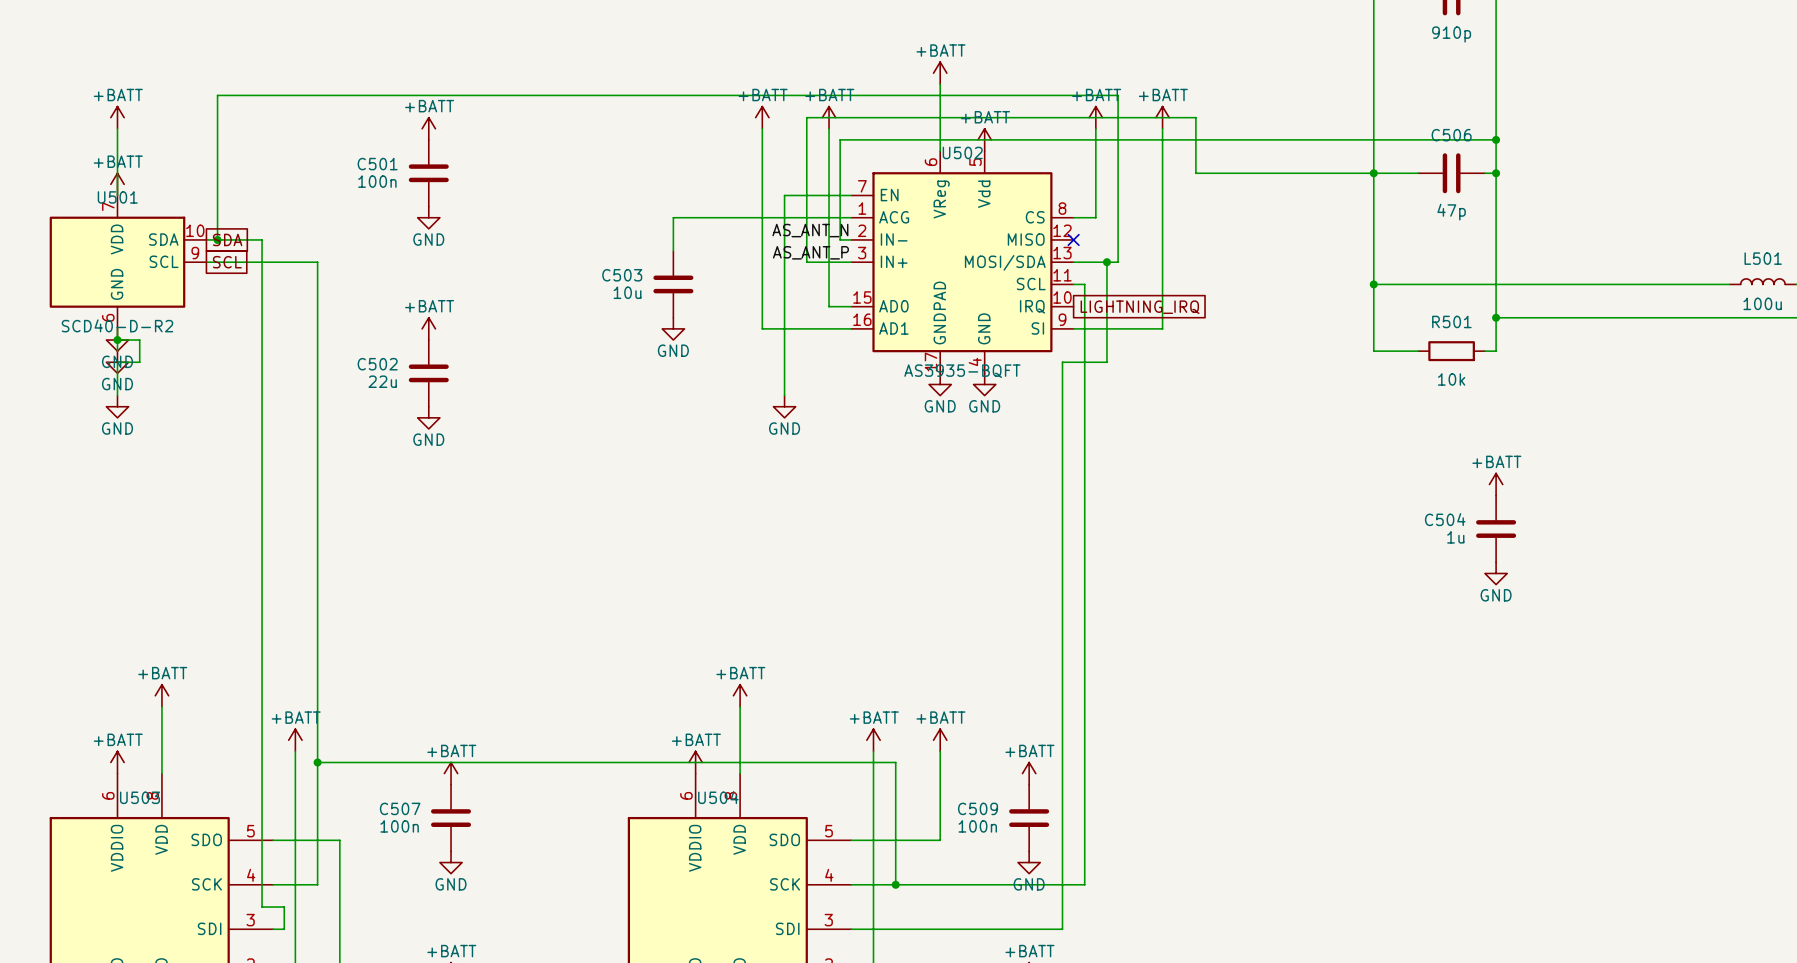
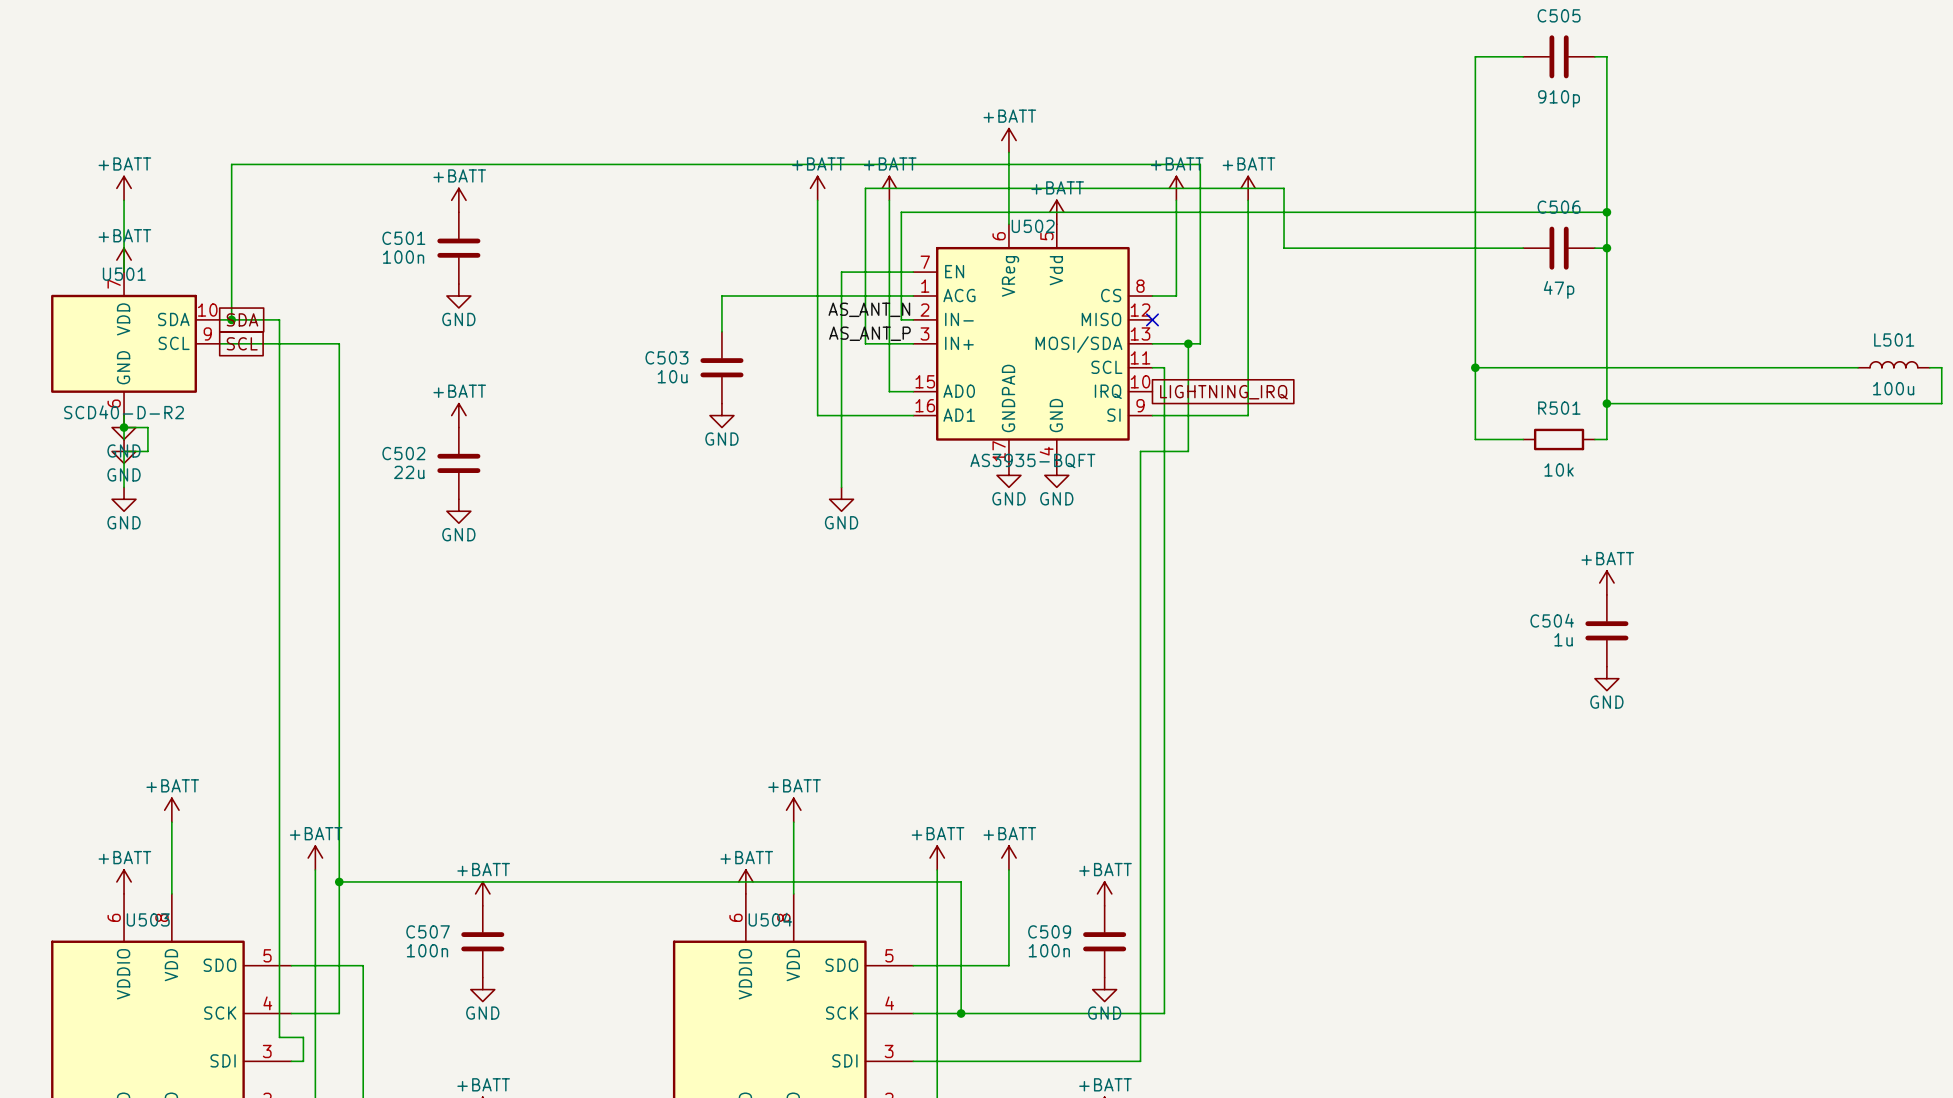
junction: (1373, 173) -> none

